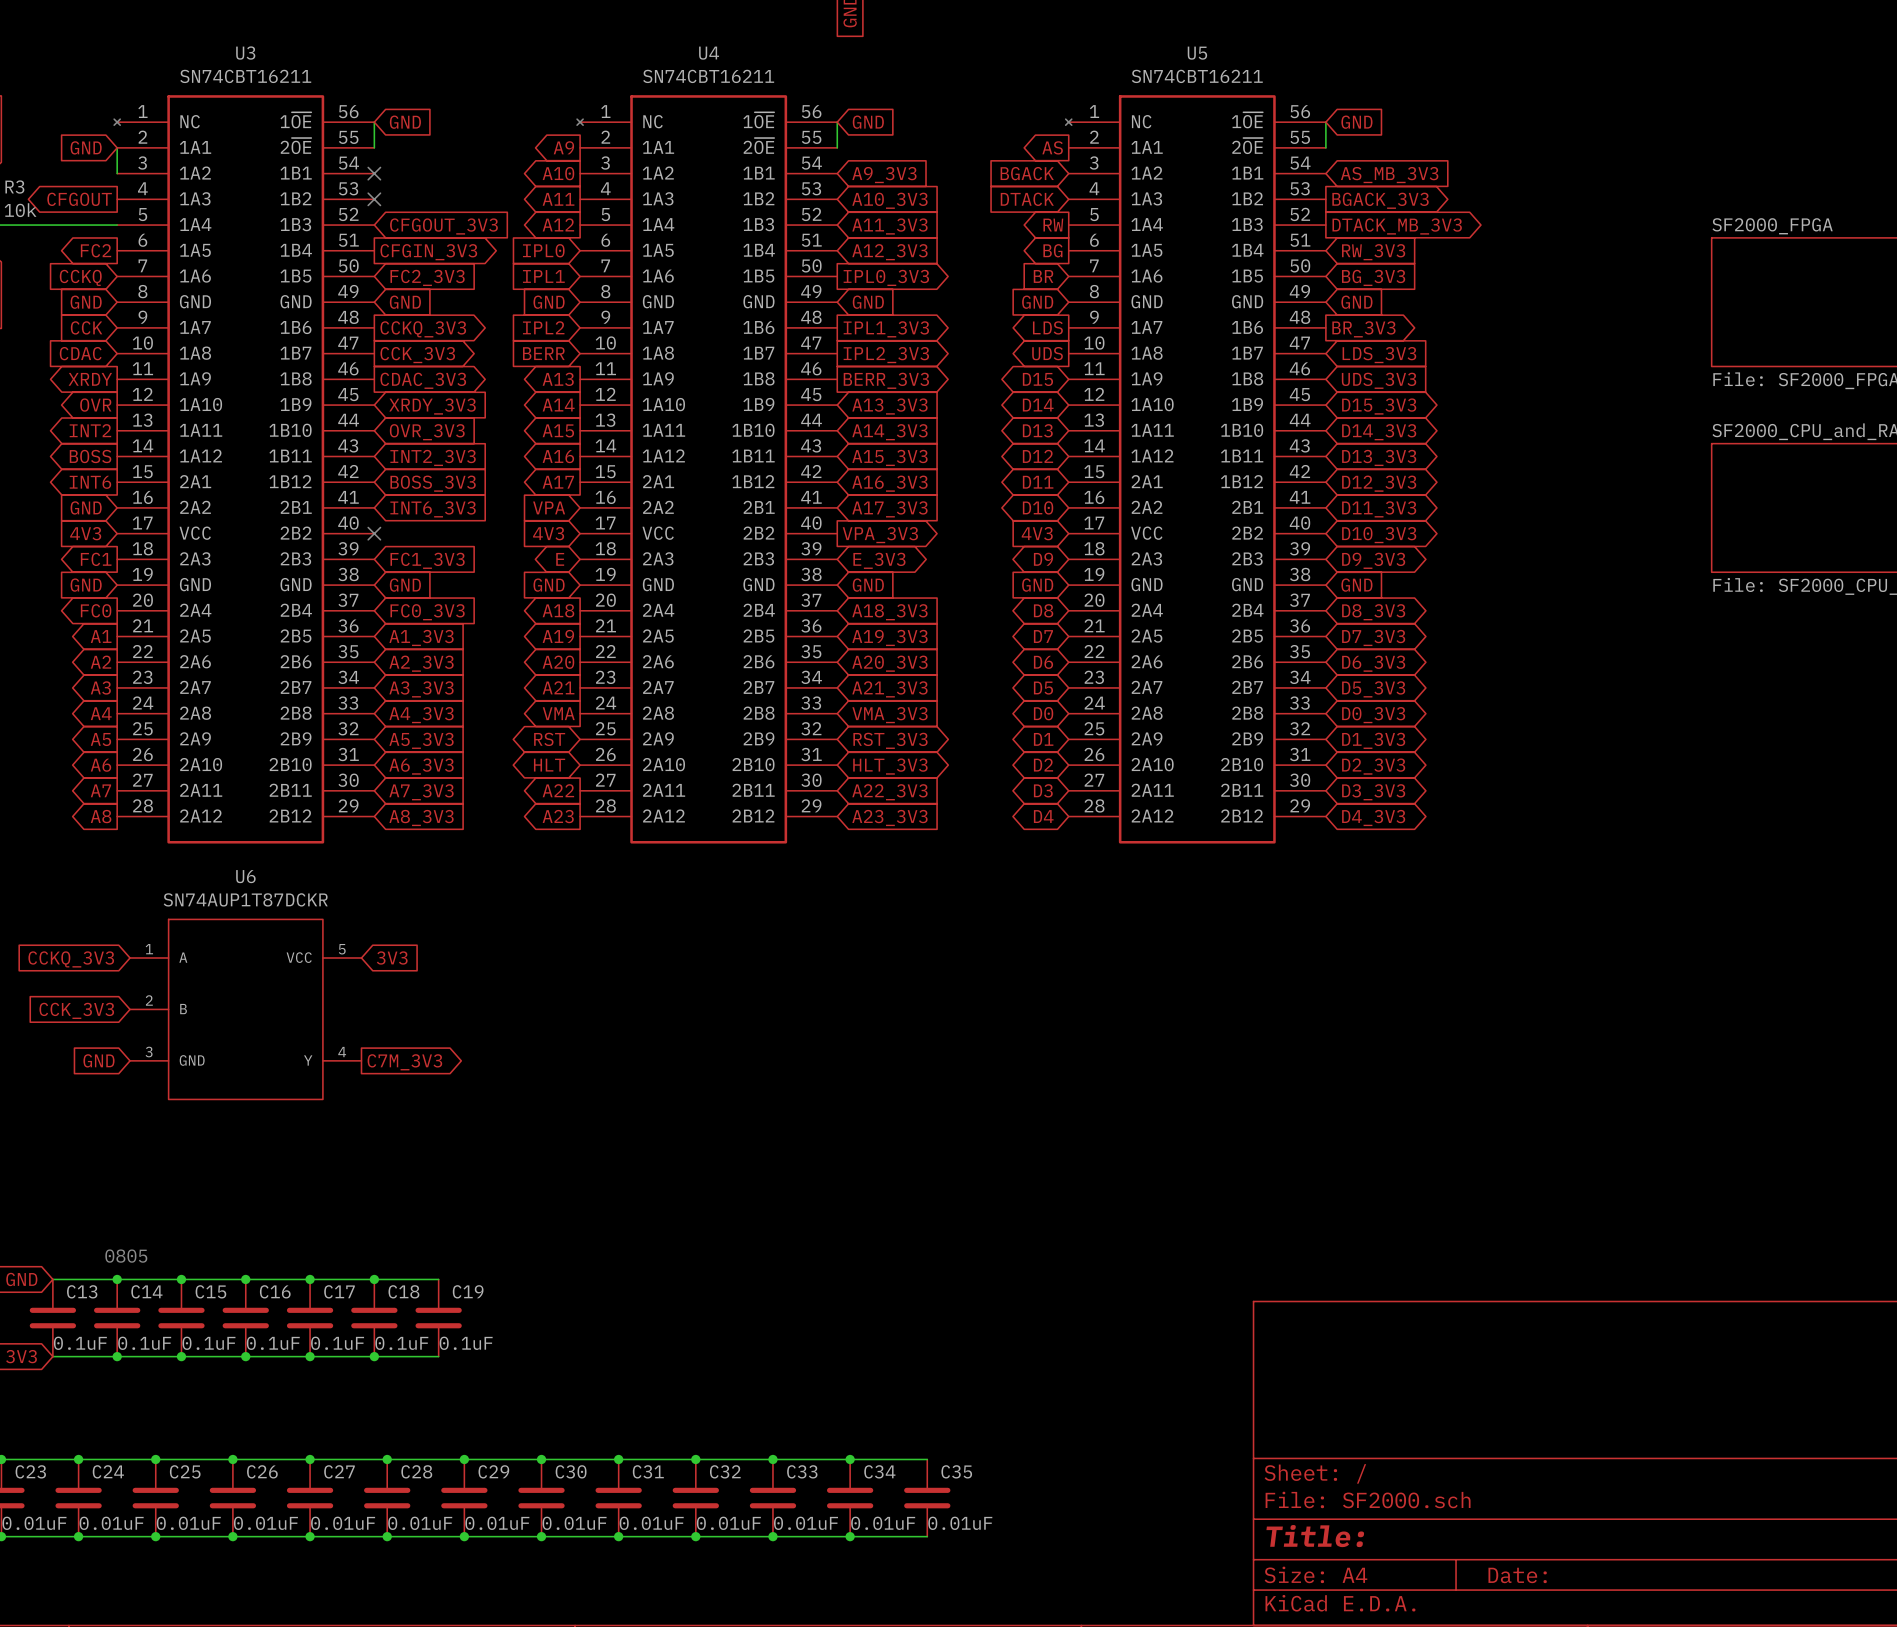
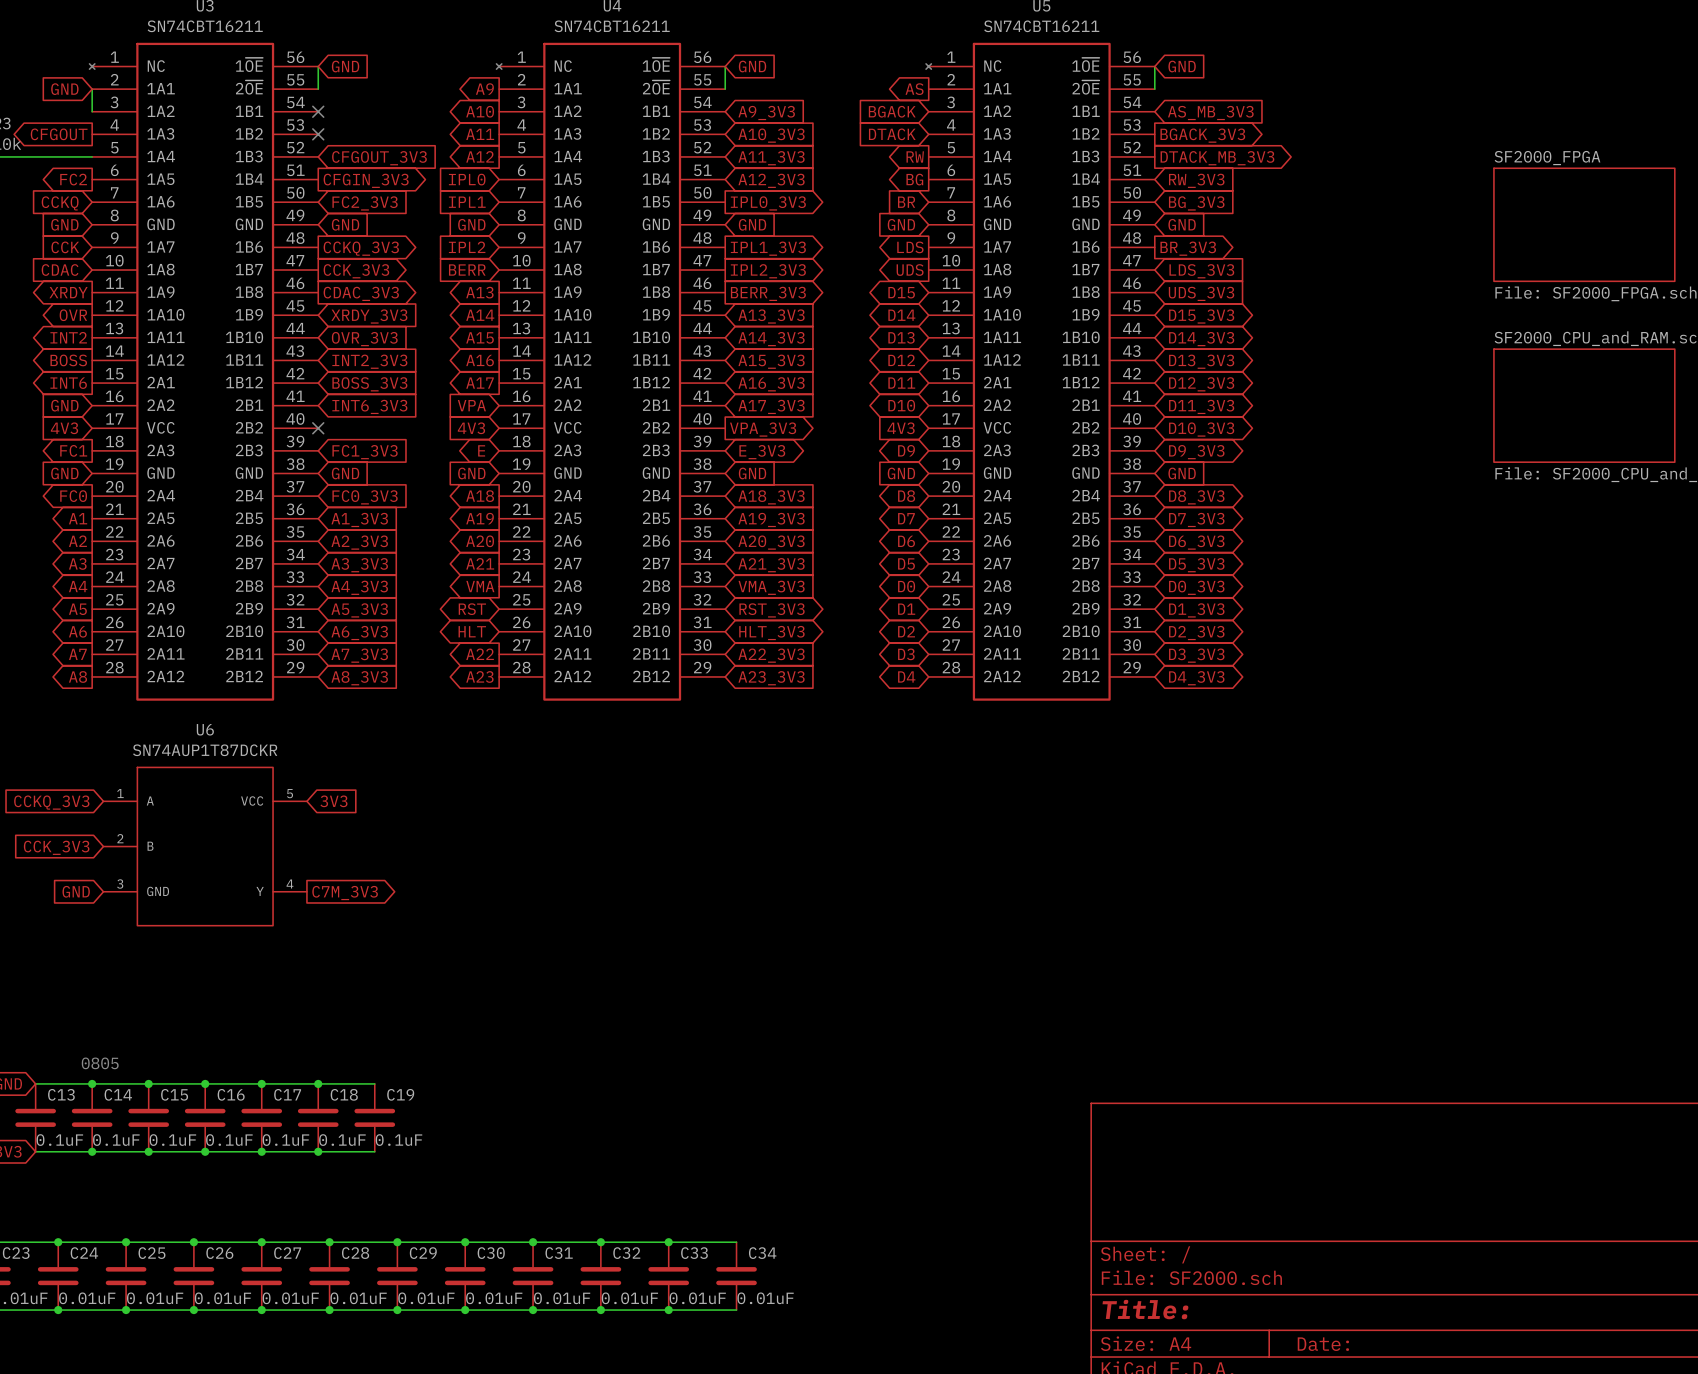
wire: (850, 1459) (927, 1459) -> none
junction: (850, 1459) -> none
C35: 0.01uF (927, 1498) -> none
wire: (850, 1536) (927, 1536) -> none
junction: (850, 1536) -> none

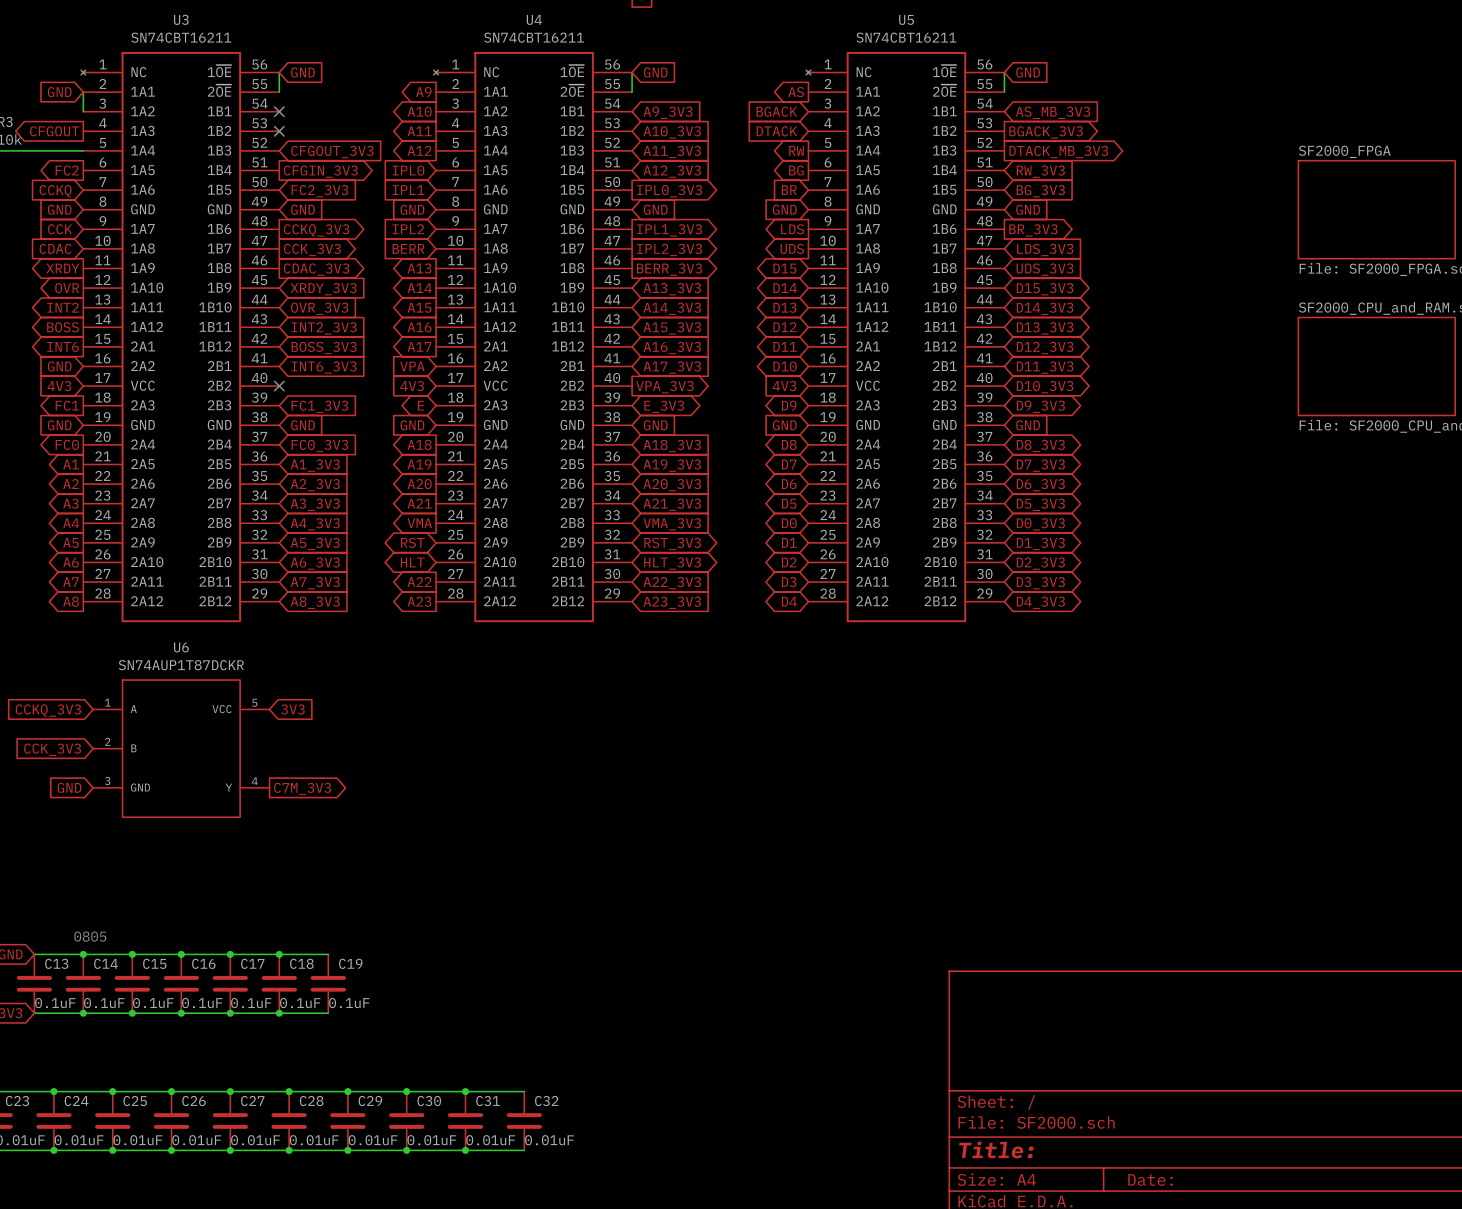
wire: (600, 1242) (736, 1242) -> none
junction: (600, 1242) -> none
junction: (668, 1242) -> none
C33: 0.01uF (668, 1276) -> none
C34: 0.01uF (736, 1276) -> none
wire: (600, 1310) (736, 1310) -> none
junction: (600, 1310) -> none
junction: (668, 1310) -> none

